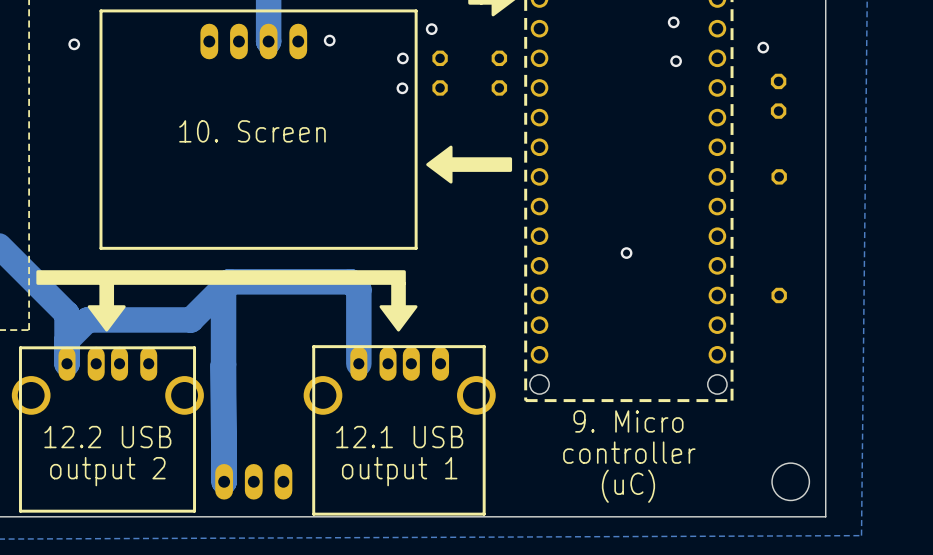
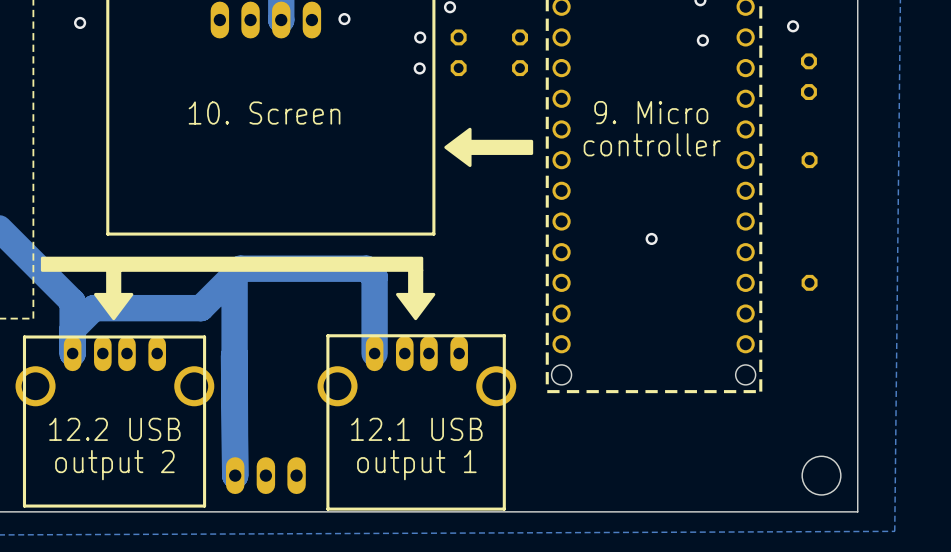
text position: 9. Micro (628, 421) -> 9. Micro (651, 112)
text position: controller (629, 452) -> controller (652, 144)
text: (uC) (628, 486) -> none

